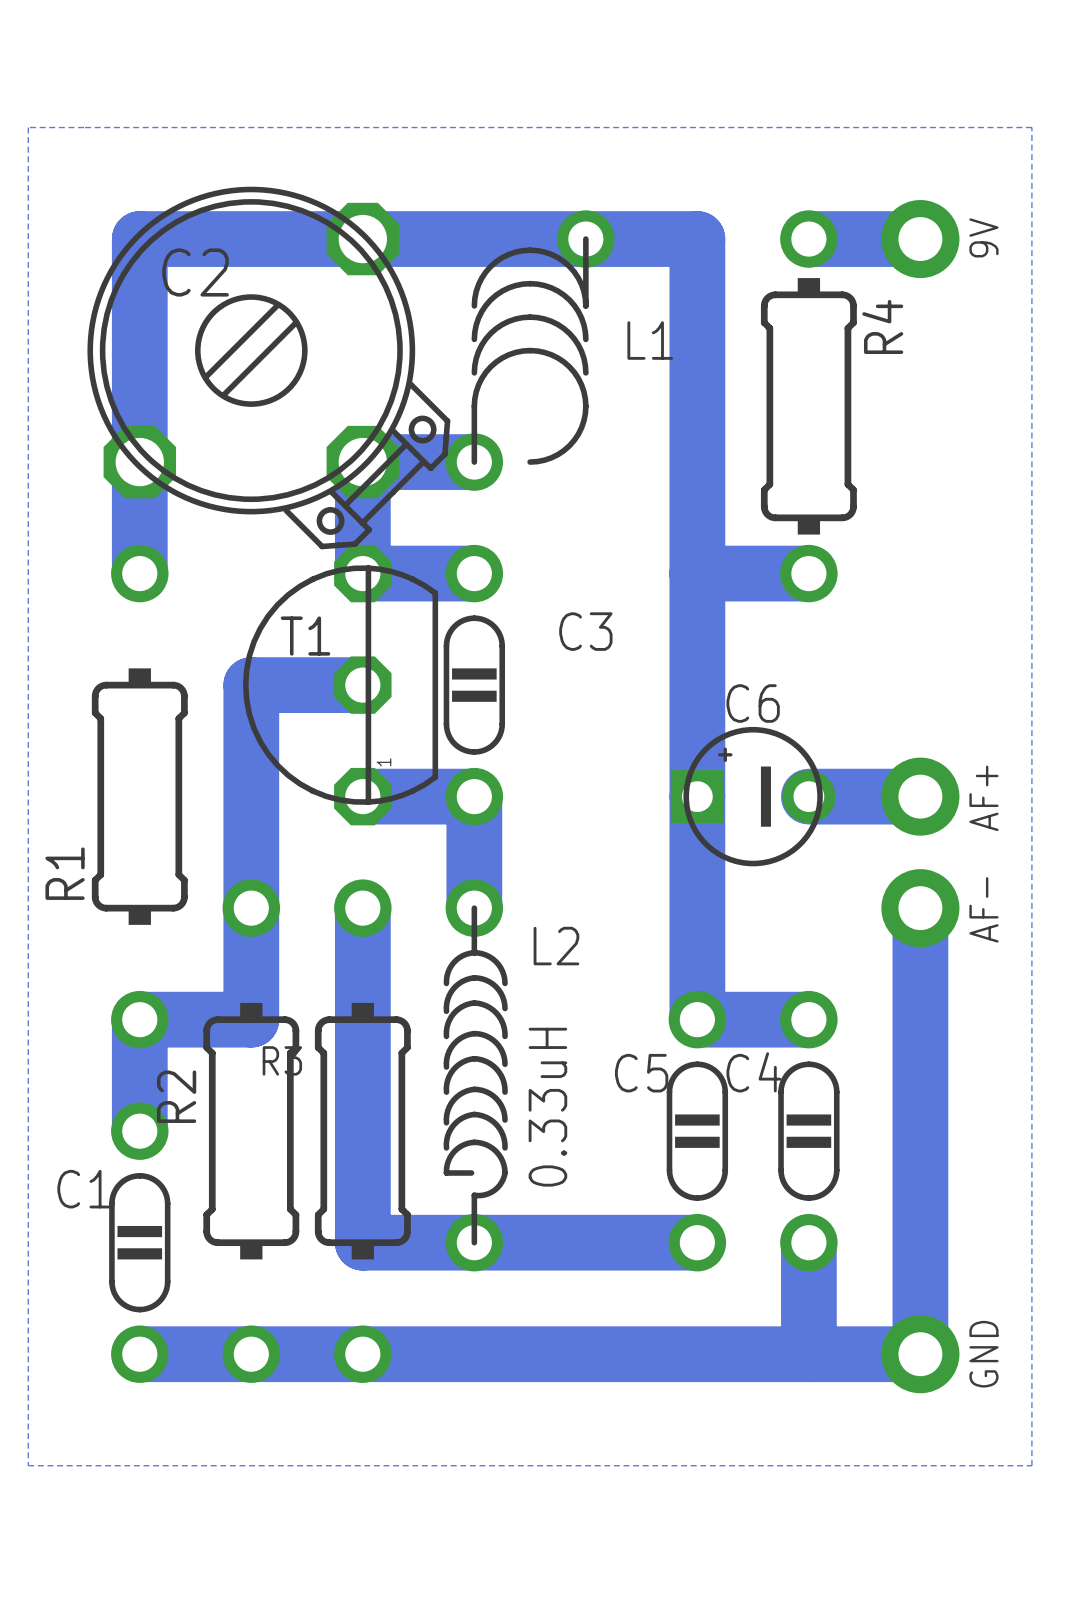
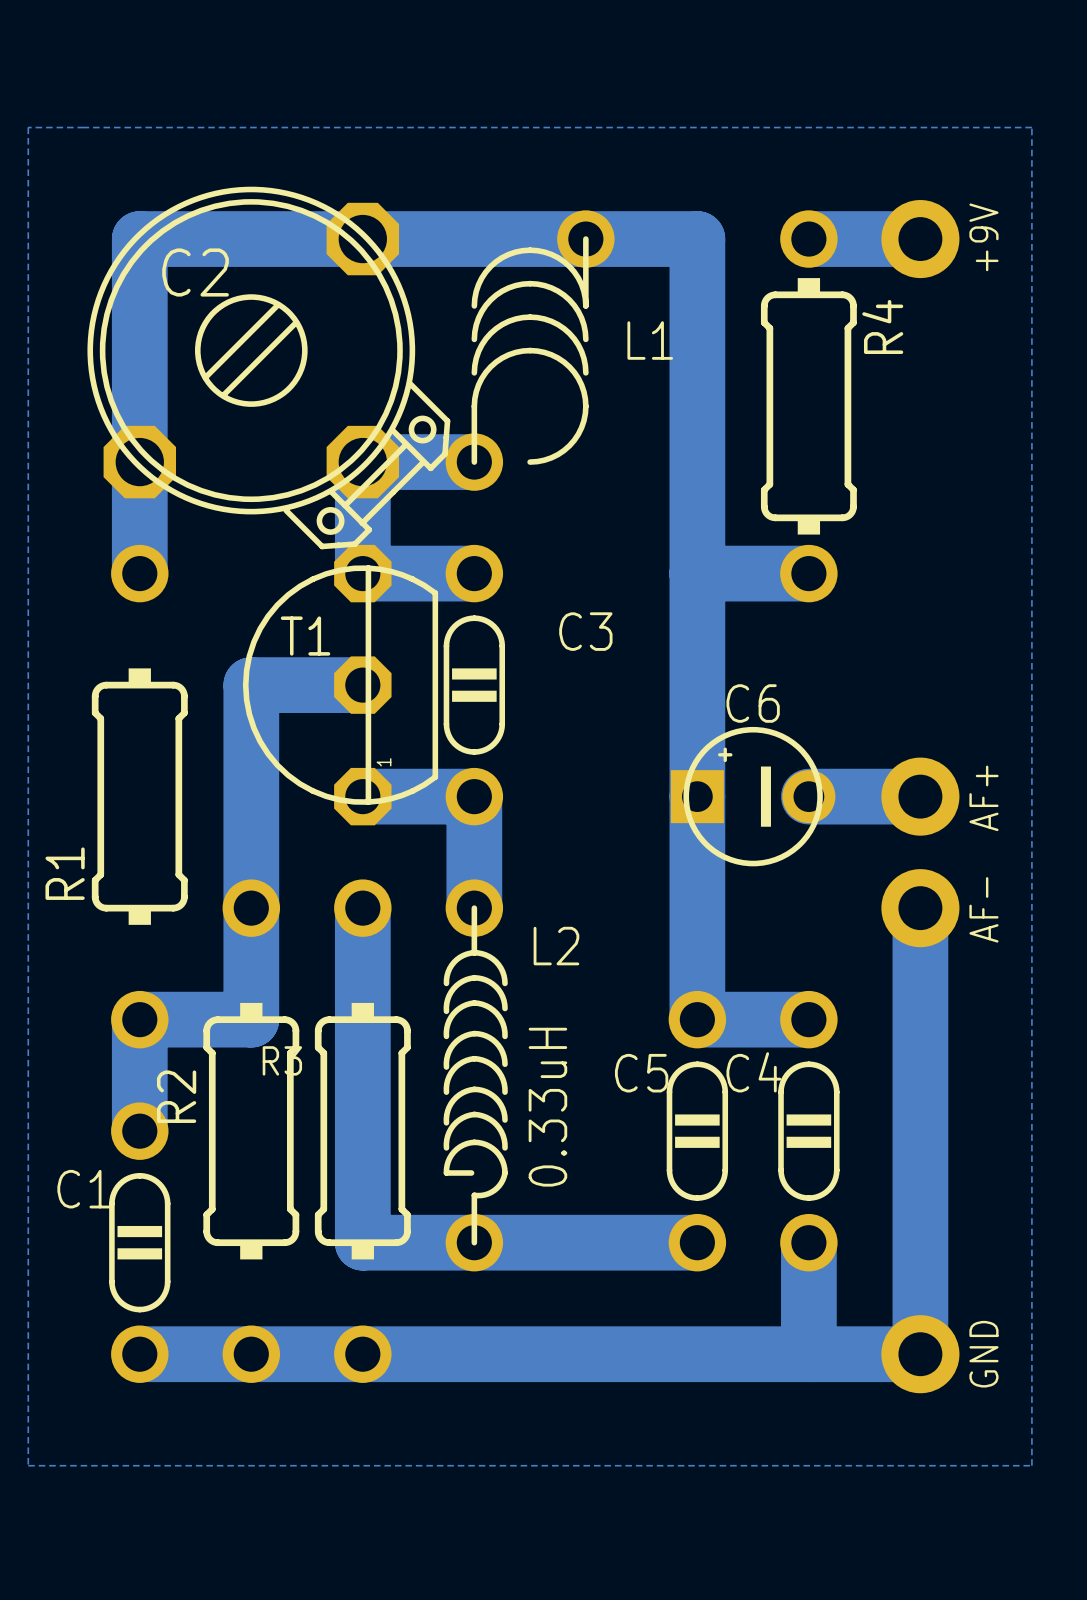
9V name: 9V (983, 237) -> +9V (983, 237)

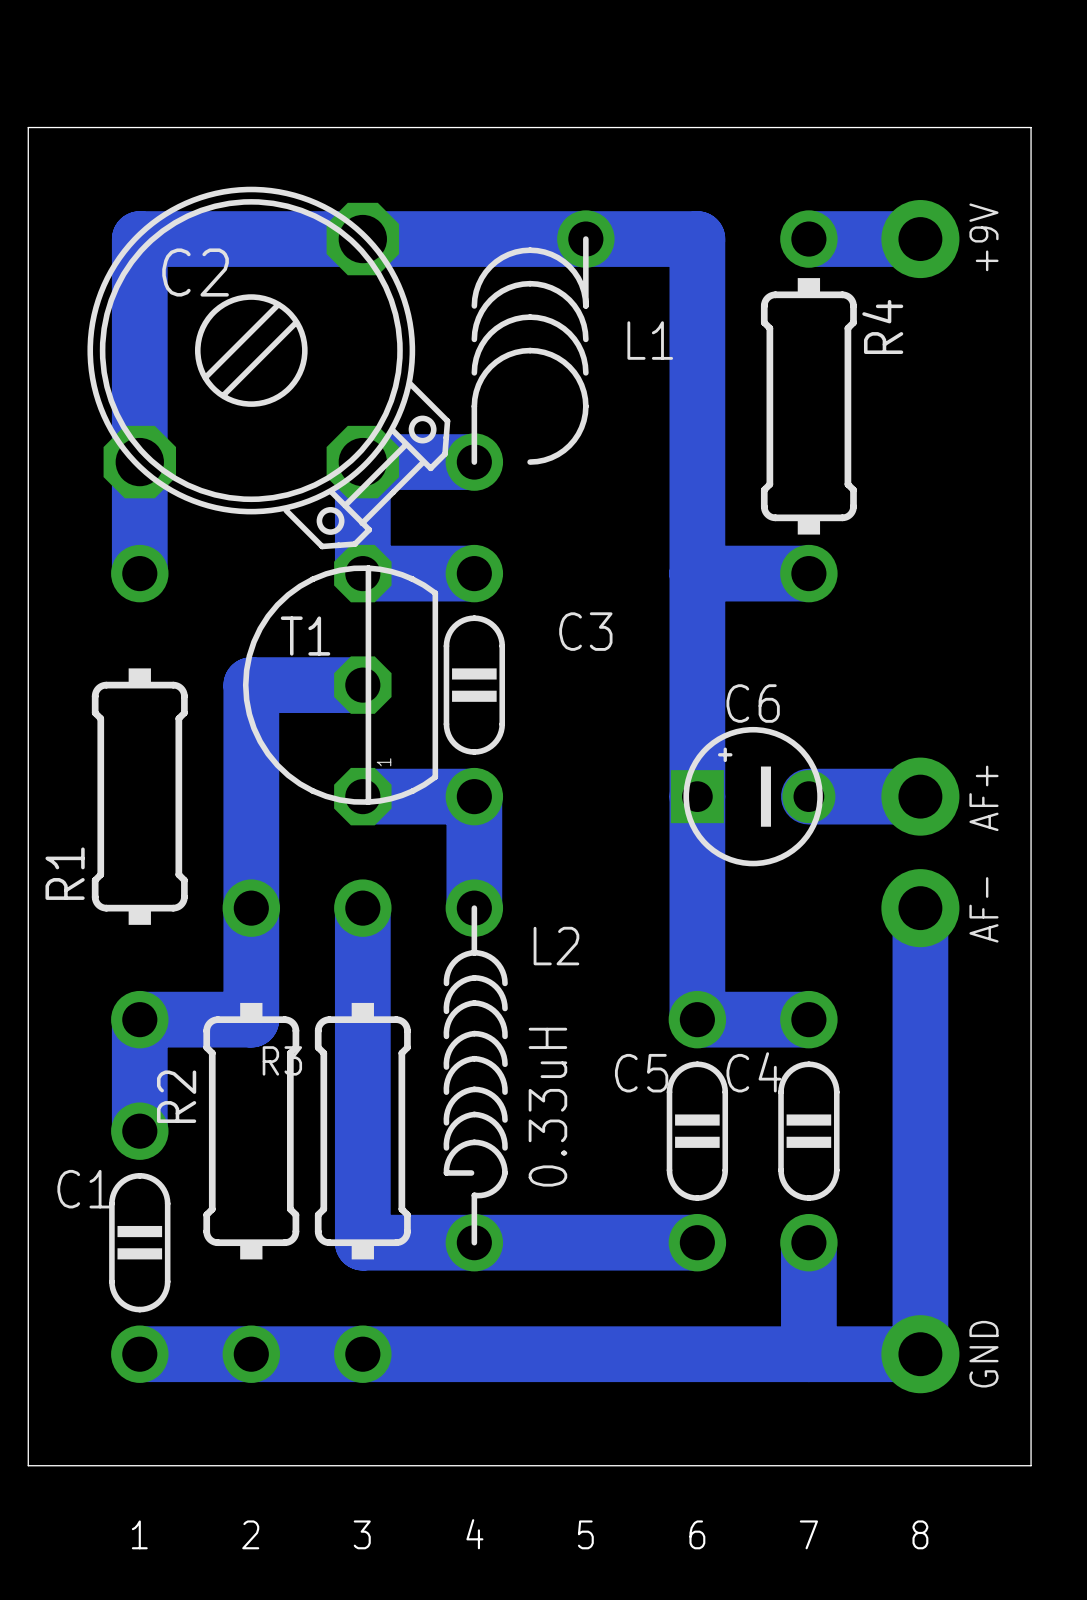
bottom zone outline: (28, 127) (28, 1465) (1031, 1465) (1031, 127) (28, 127) -> none
board edge: none -> (28, 127) (1031, 127) (1031, 1465) (28, 1465) (28, 127)
text: none -> 1 (139, 1534)
text: none -> 2 (250, 1534)
text: none -> 3 (362, 1534)
text: none -> 4 (474, 1534)
text: none -> 5 (585, 1534)
text: none -> 6 (697, 1534)
text: none -> 7 (808, 1534)
text: none -> 8 (920, 1534)

